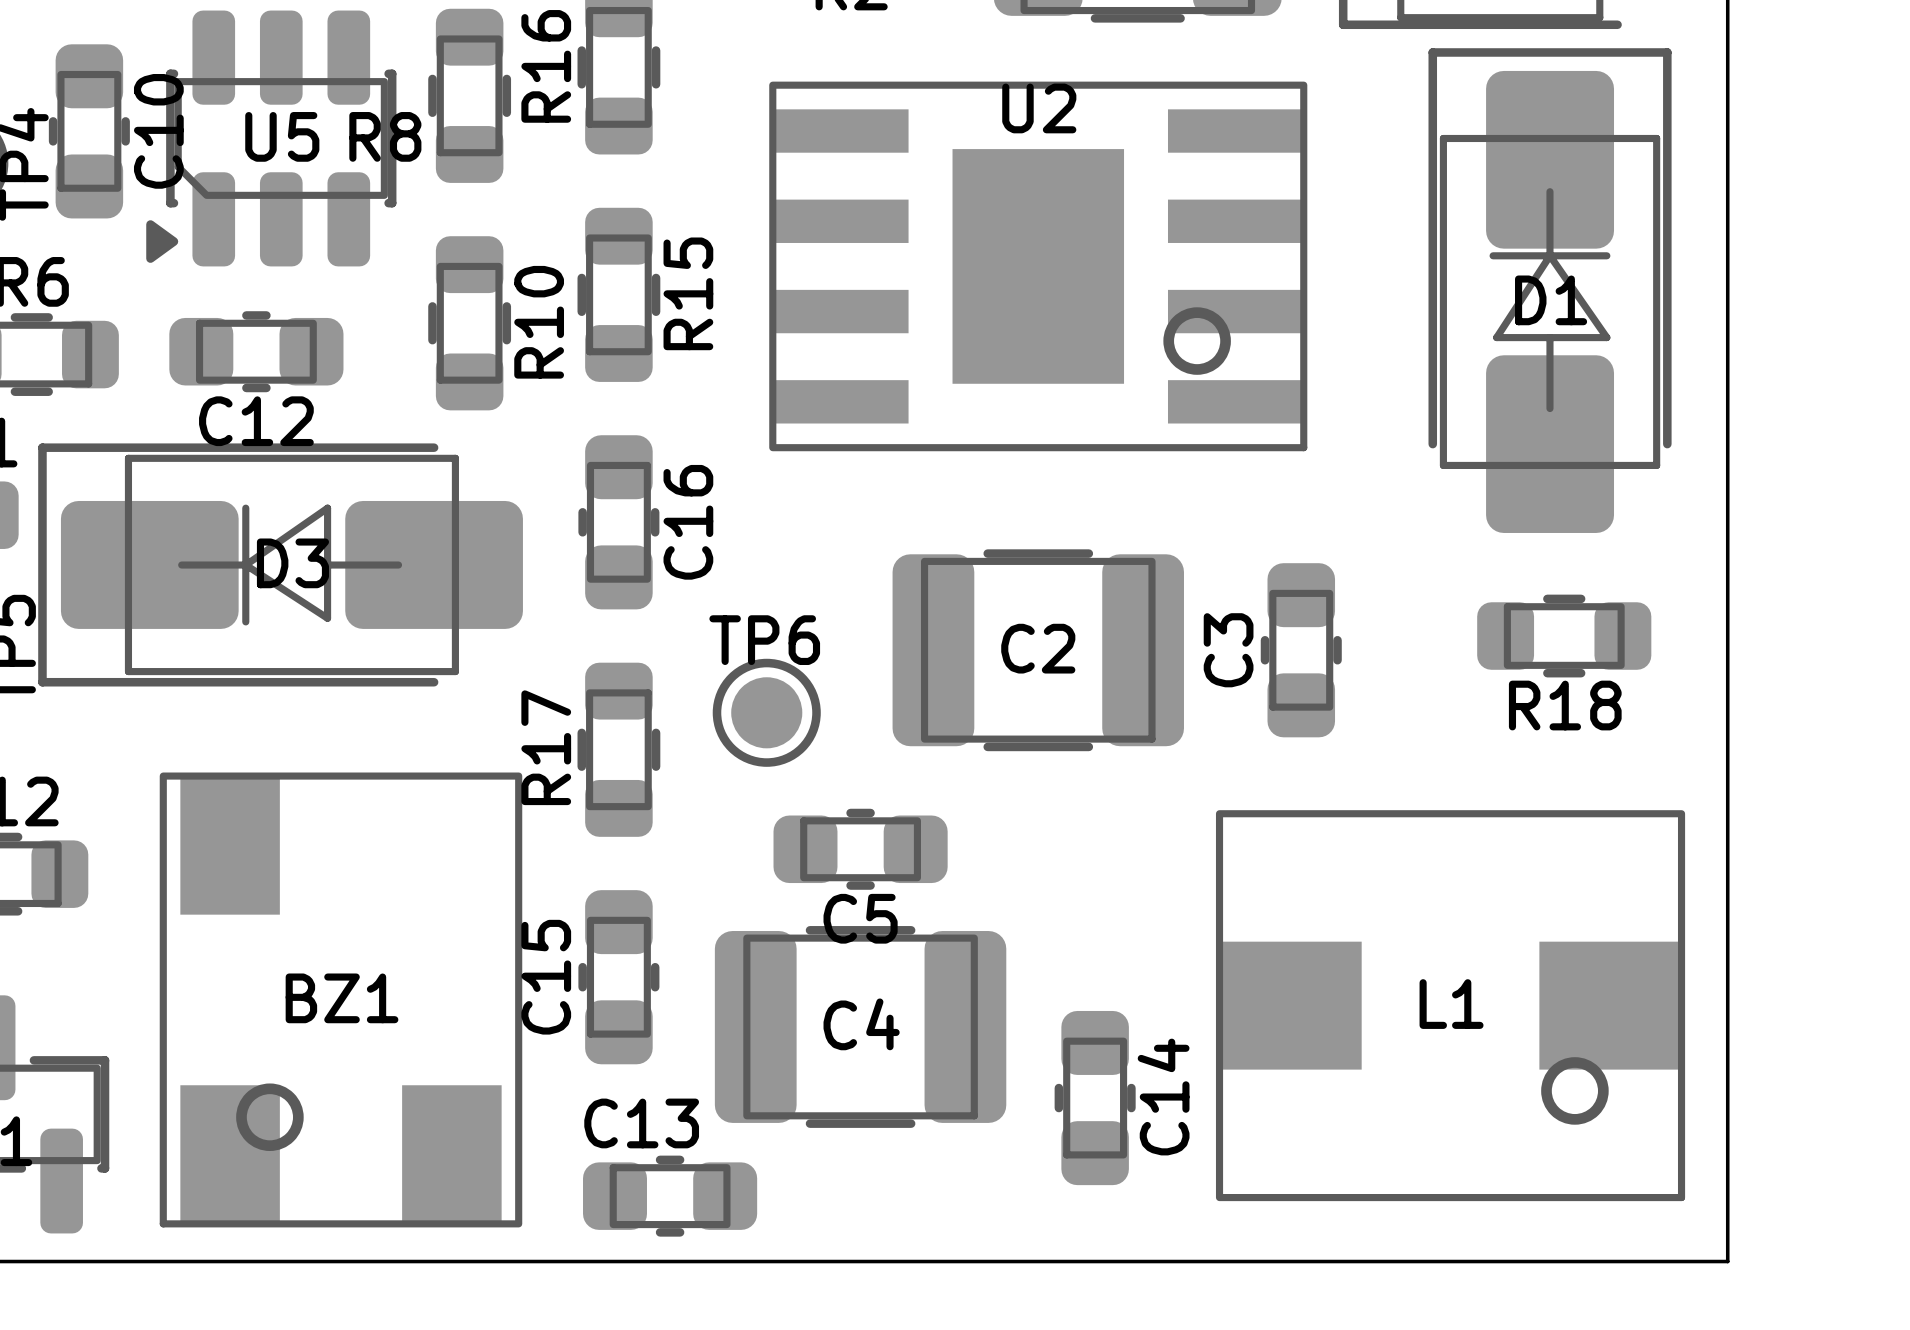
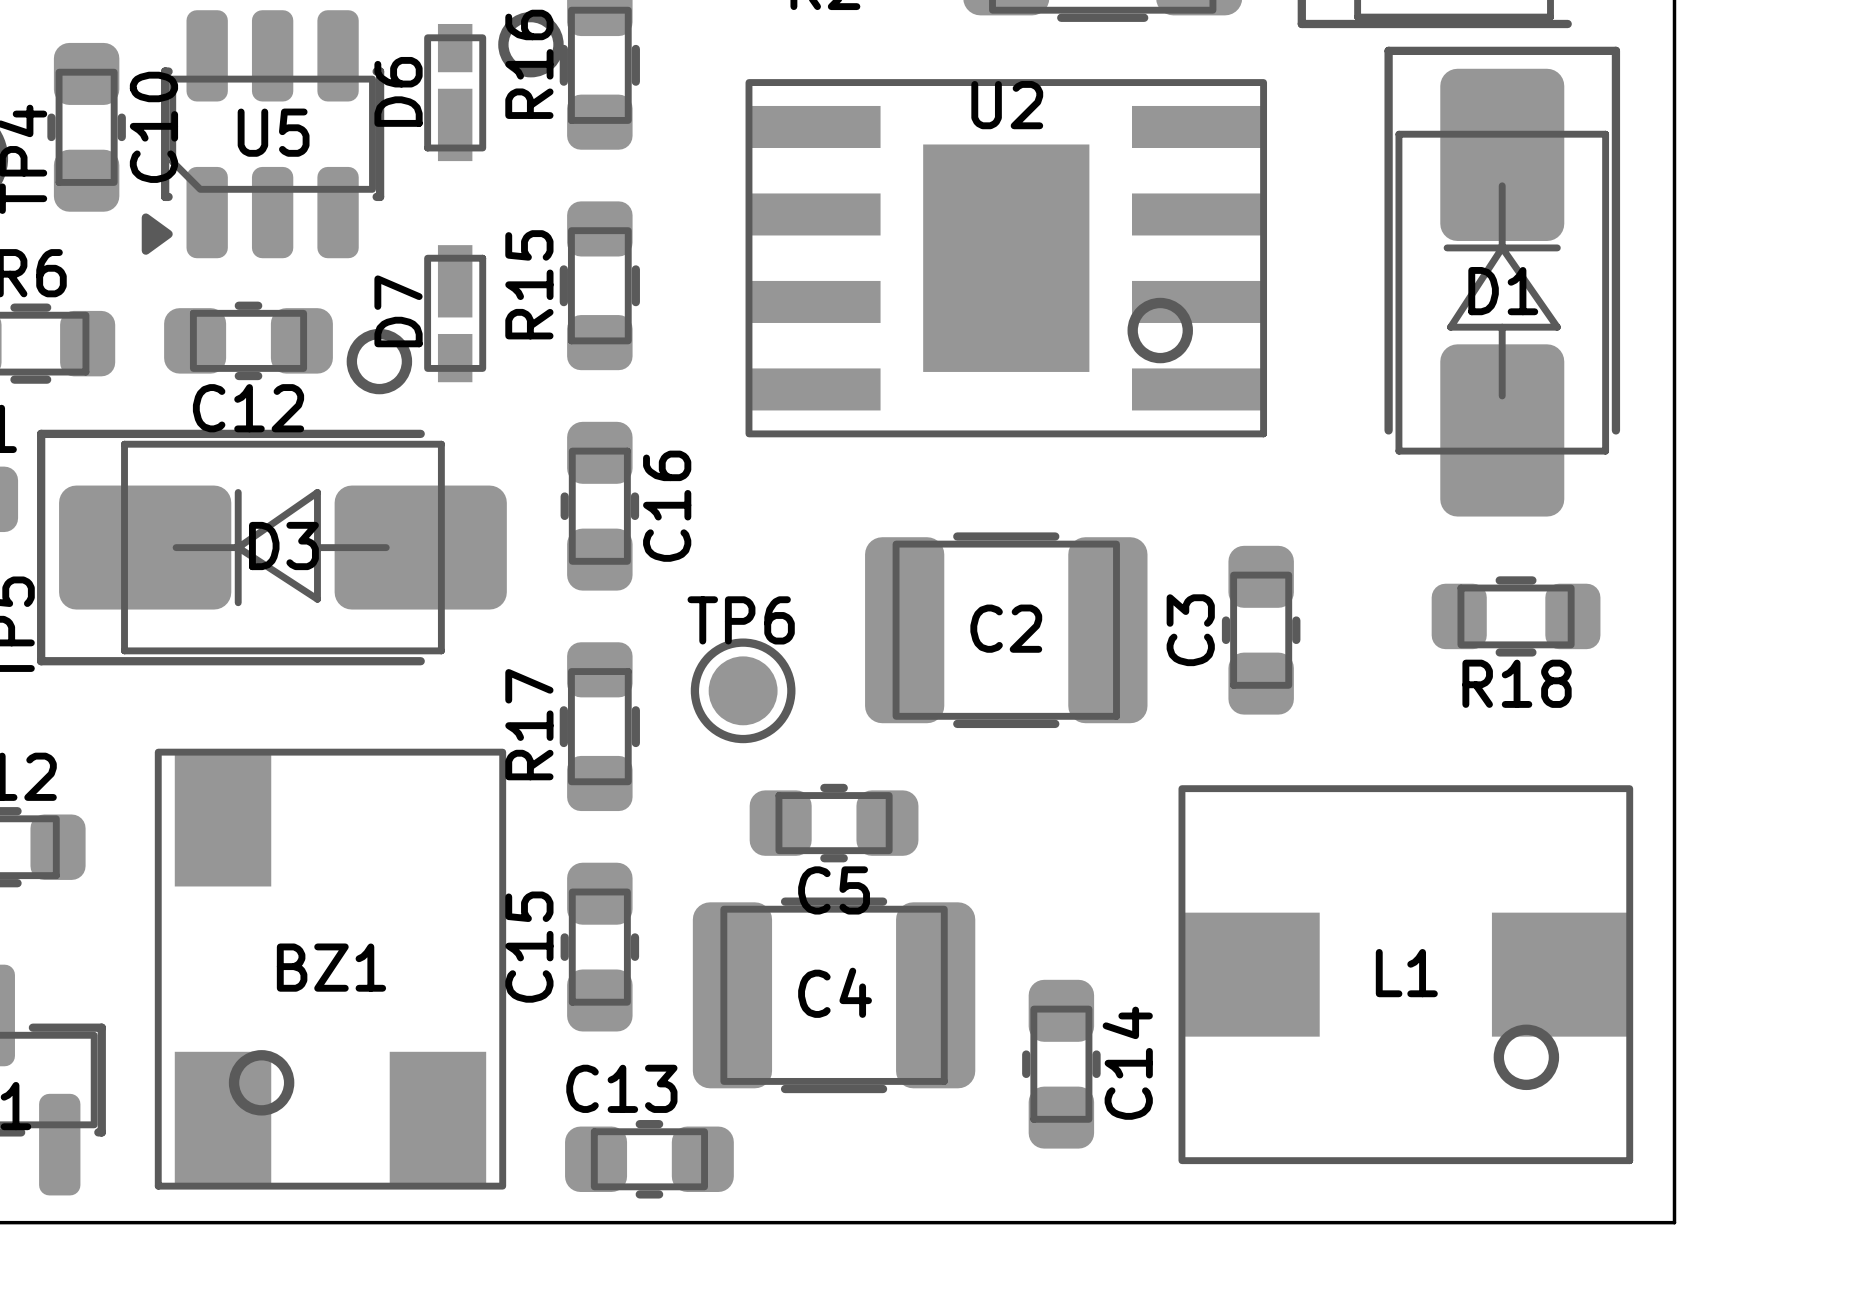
D6: none -> (493, 86)
R8: (469, 95) -> none
R15 name position: R15 (688, 293) -> R15 (529, 284)
R10: (469, 323) -> none
D7: none -> (416, 319)

